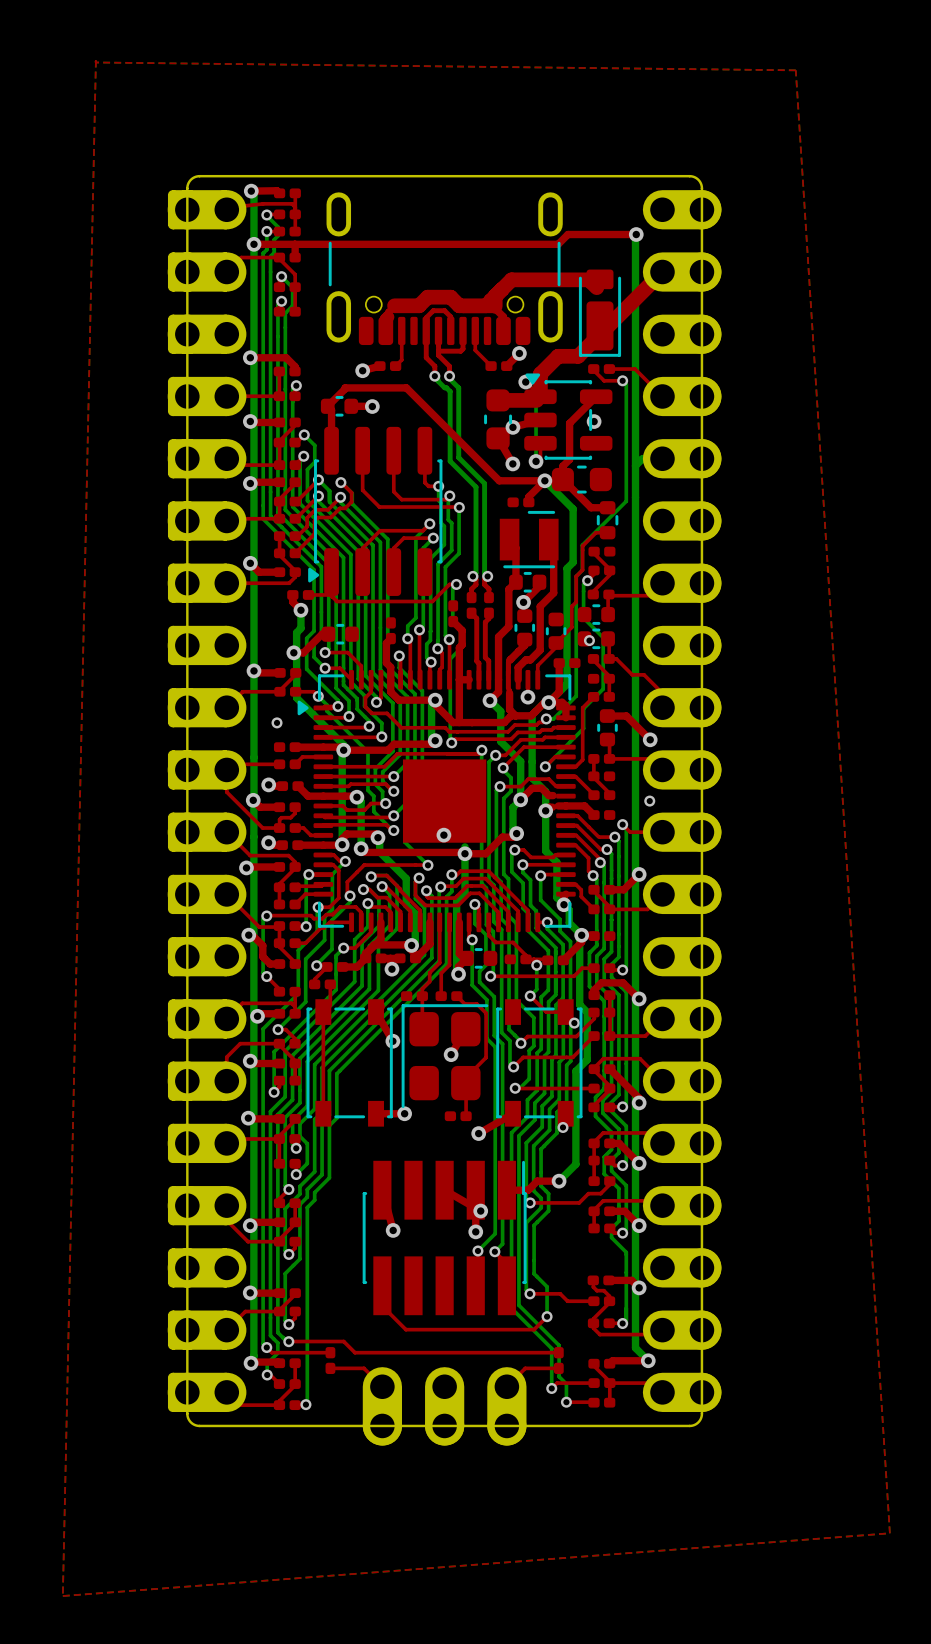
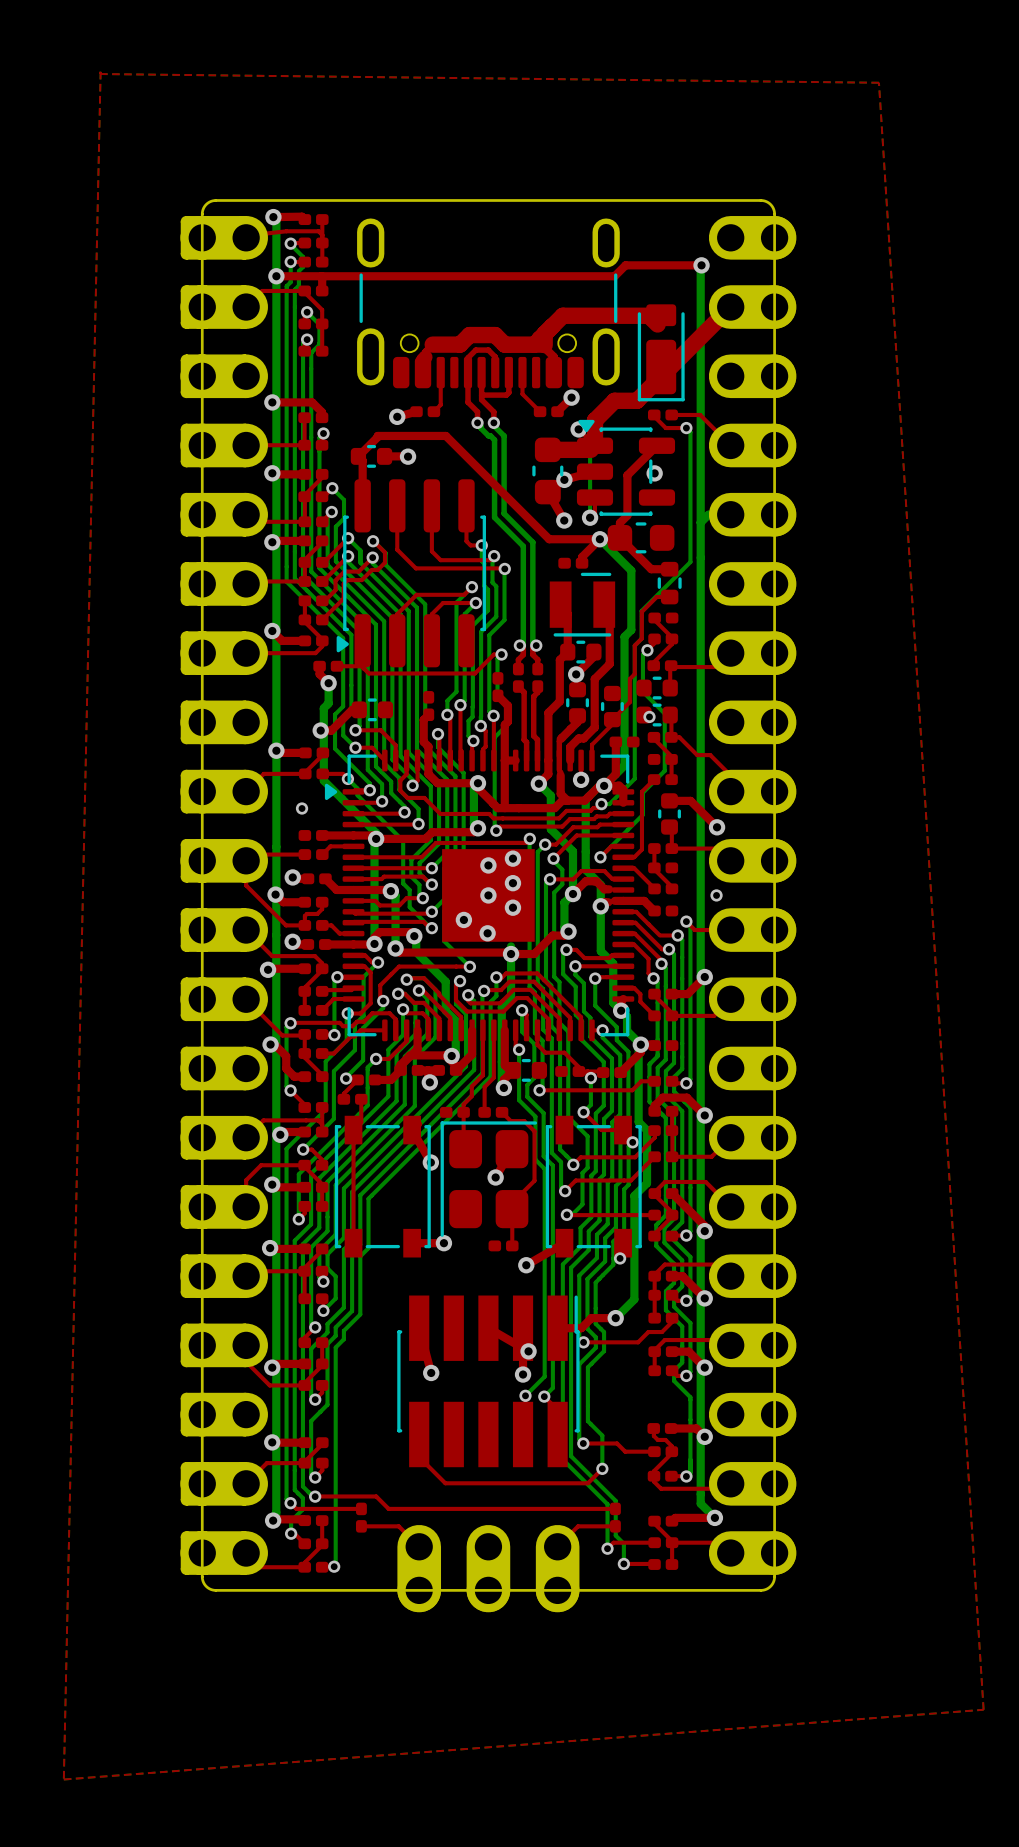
via: none -> (512, 858)
via: none -> (488, 865)
via: none -> (512, 883)
via: none -> (488, 895)
via: none -> (512, 907)
via: none -> (463, 919)

